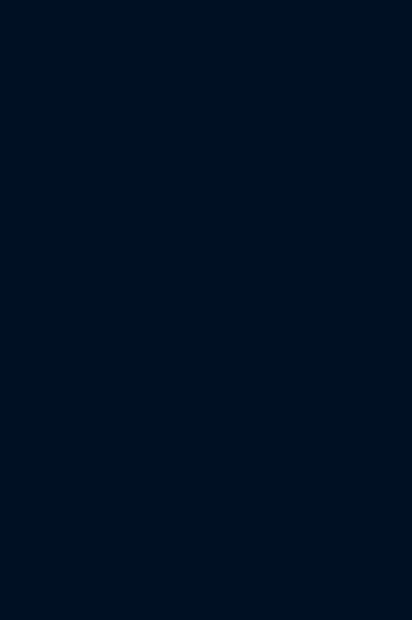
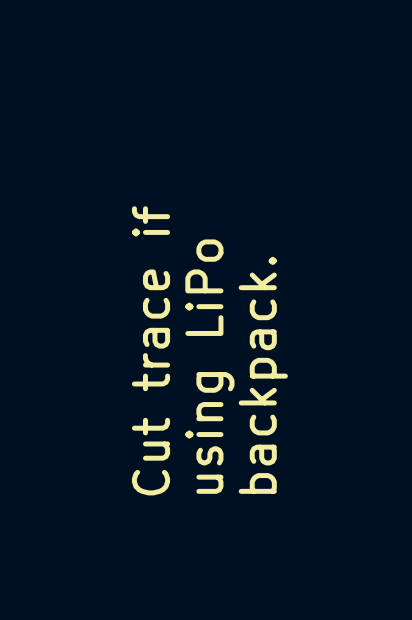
text: none -> Cut trace if (151, 350)
text: none -> using LiPo (209, 366)
text: none -> backpack. (263, 375)

